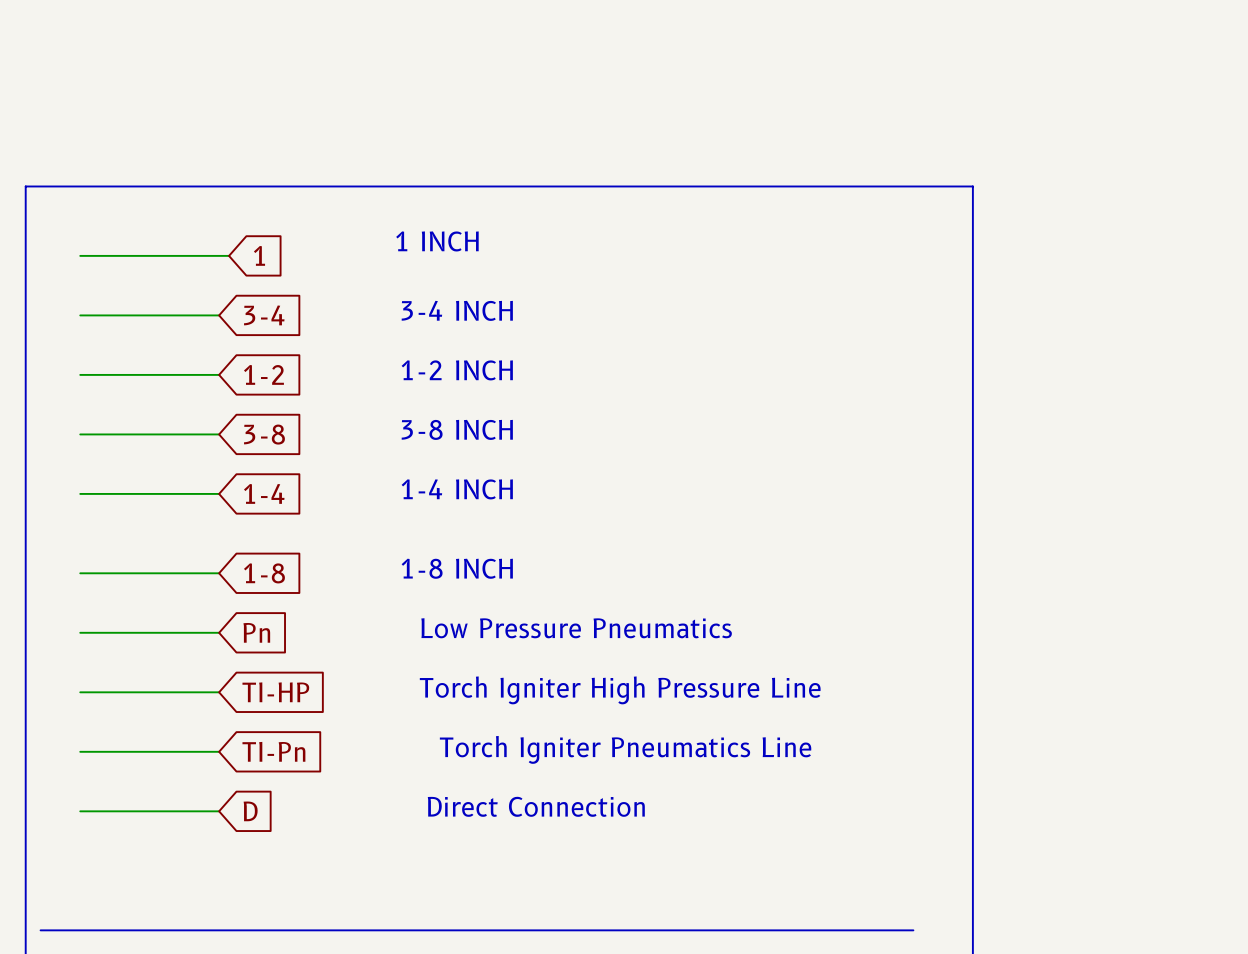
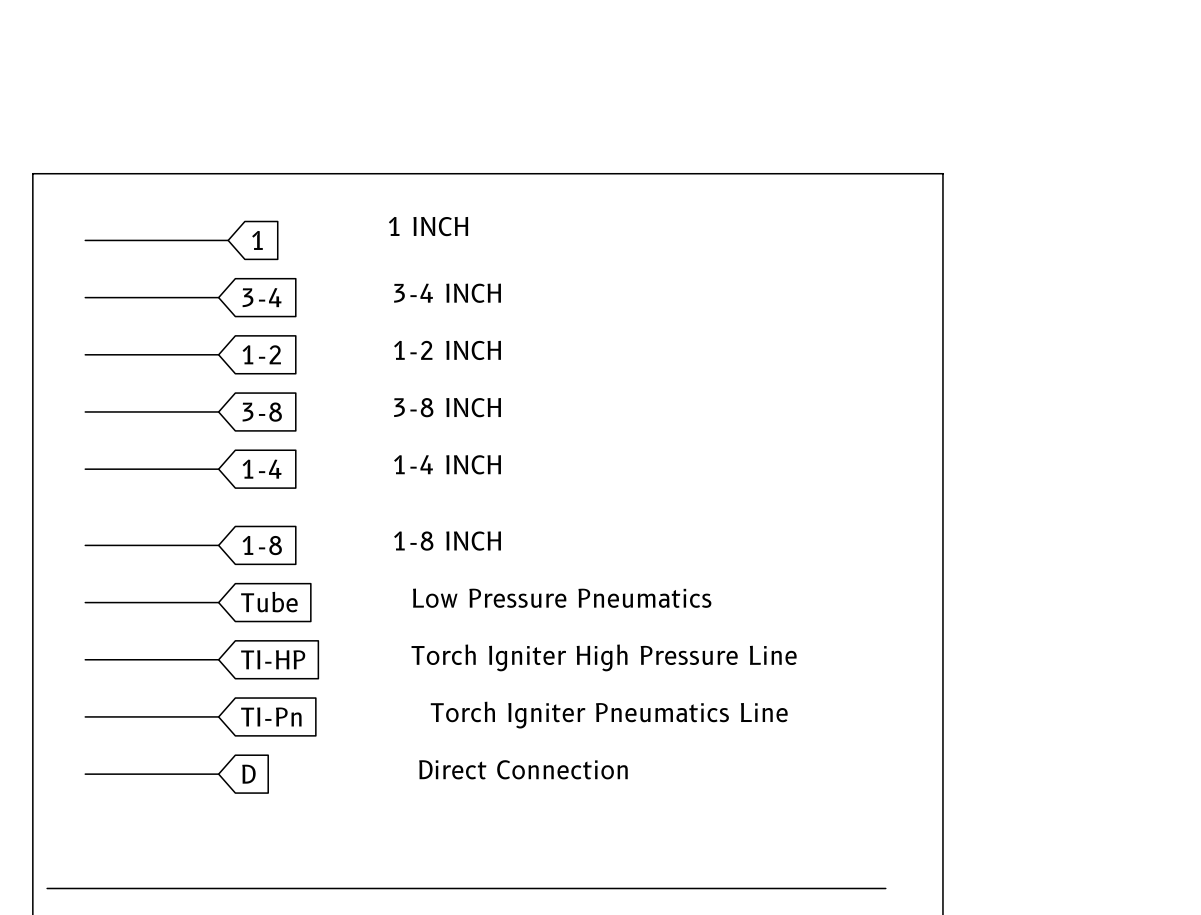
global label: Pn (256, 632) -> Tube (269, 602)

